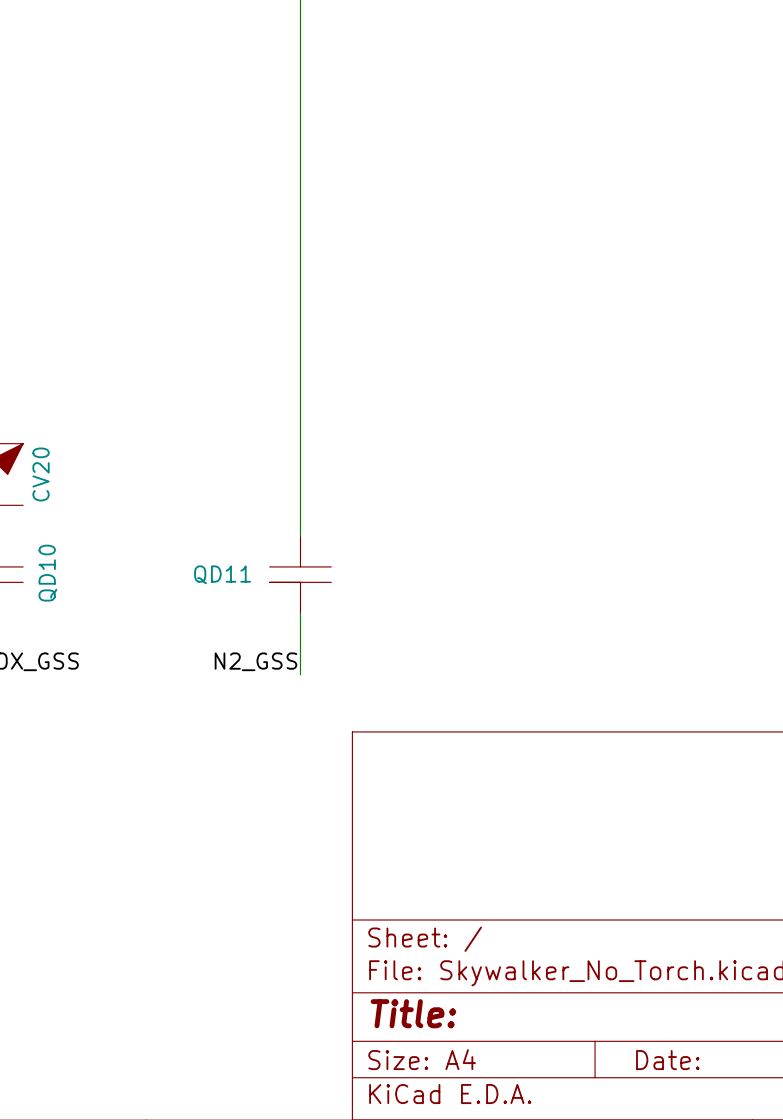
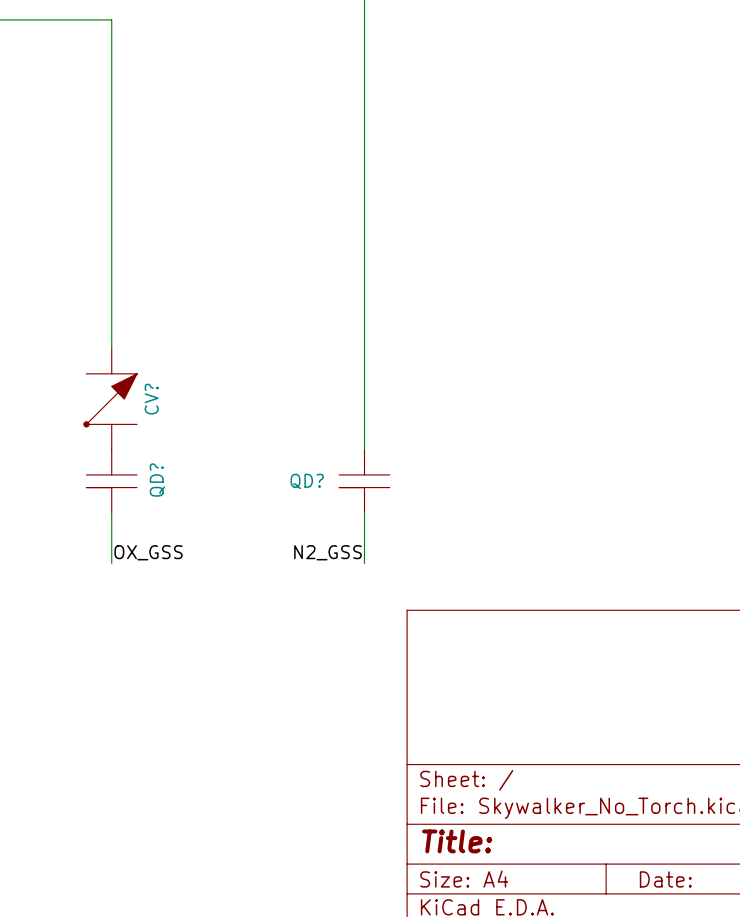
CV20 name: CV20 (41, 474) -> CV? (151, 399)
QD10 name: QD10 (47, 573) -> QD? (157, 480)
QD11 name: QD11 (222, 574) -> QD? (307, 481)

